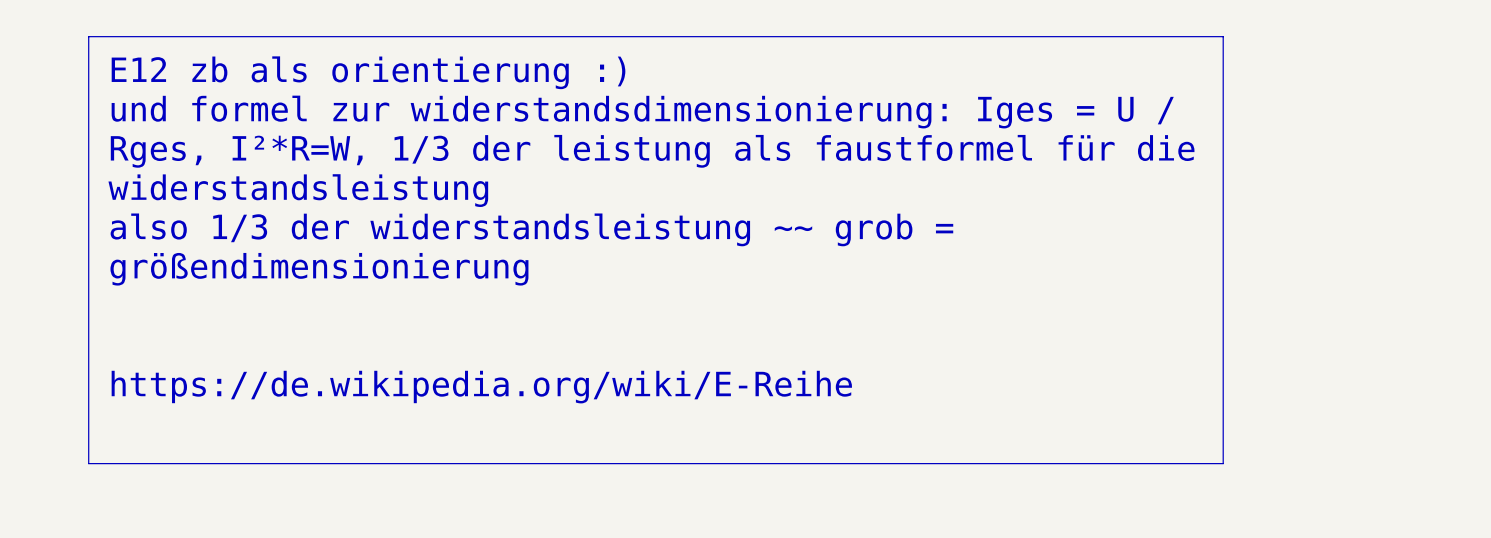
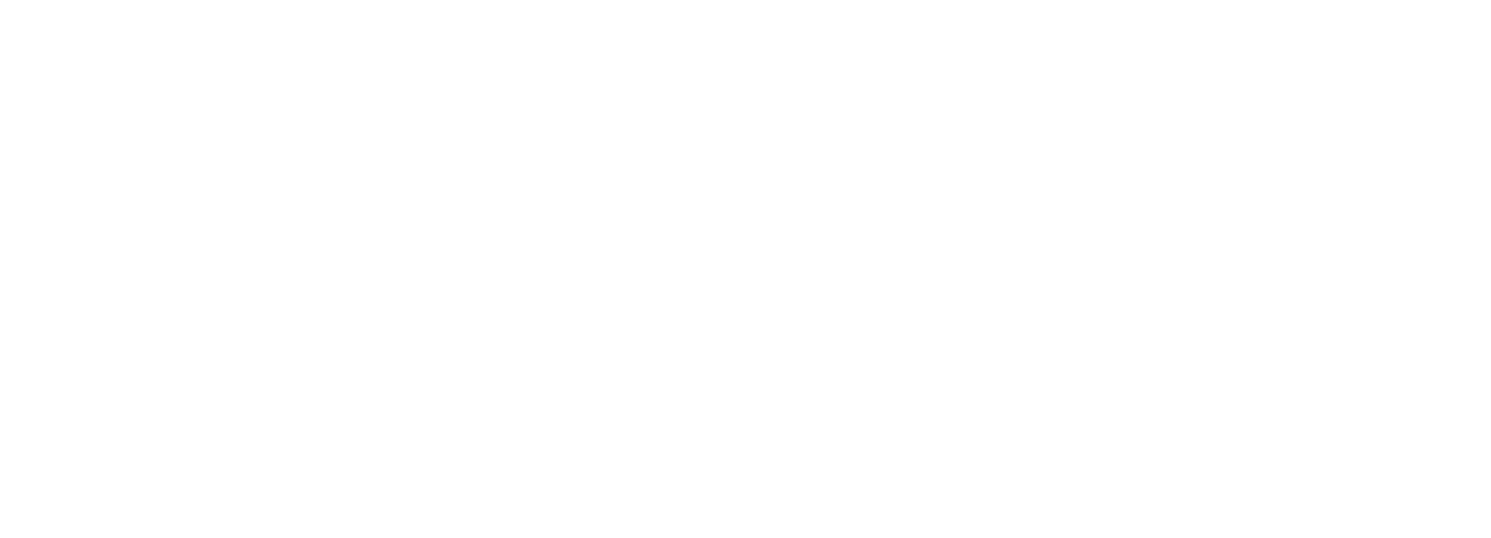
line: (88, 36) (1223, 36) (1223, 463) (88, 463) (88, 36) -> none
text: E12 zb als orientierung :) (368, 72) -> none
text: und formel zur widerstandsdimensionierung: Iges = U / (642, 112) -> none
text: Rges, I²*R=W, 1/3 der leistung als faustformel für die (652, 151) -> none
text: widerstandsleistung (298, 190) -> none
text: also 1/3 der widerstandsleistung ~~ grob = (531, 229) -> none
text: größendimensionierung (319, 269) -> none
text: https://de.wikipedia.org/wiki/E-Reihe (481, 387) -> none

